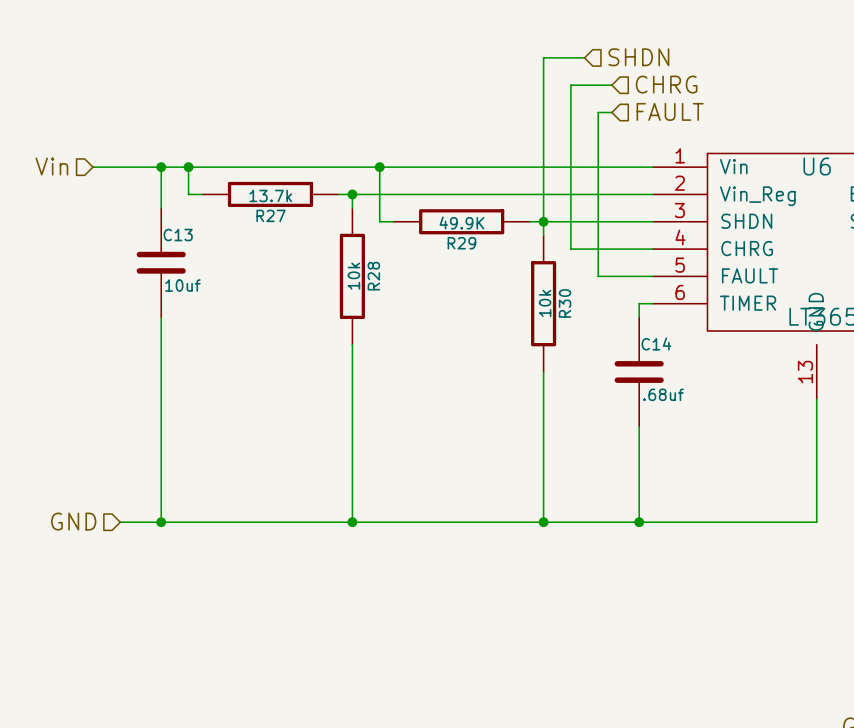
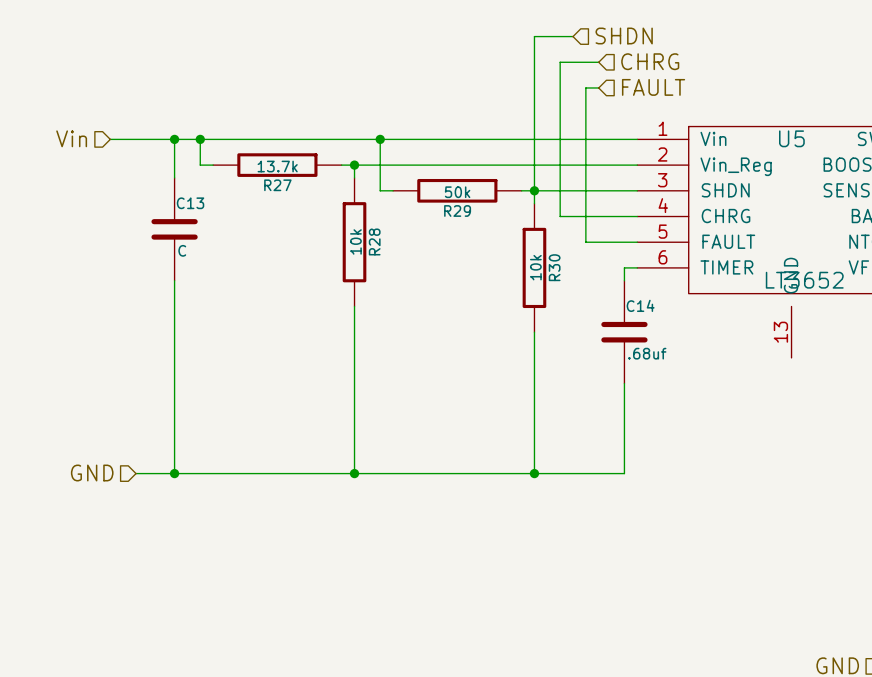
U6 name: U6 (817, 166) -> U5 (791, 138)
R29 value: 49.9K (461, 223) -> 50k (457, 192)
C13 value: 10uf (182, 285) -> C (182, 250)
wire: (816, 399) (816, 522) (639, 522) -> none
junction: (639, 522) -> none

